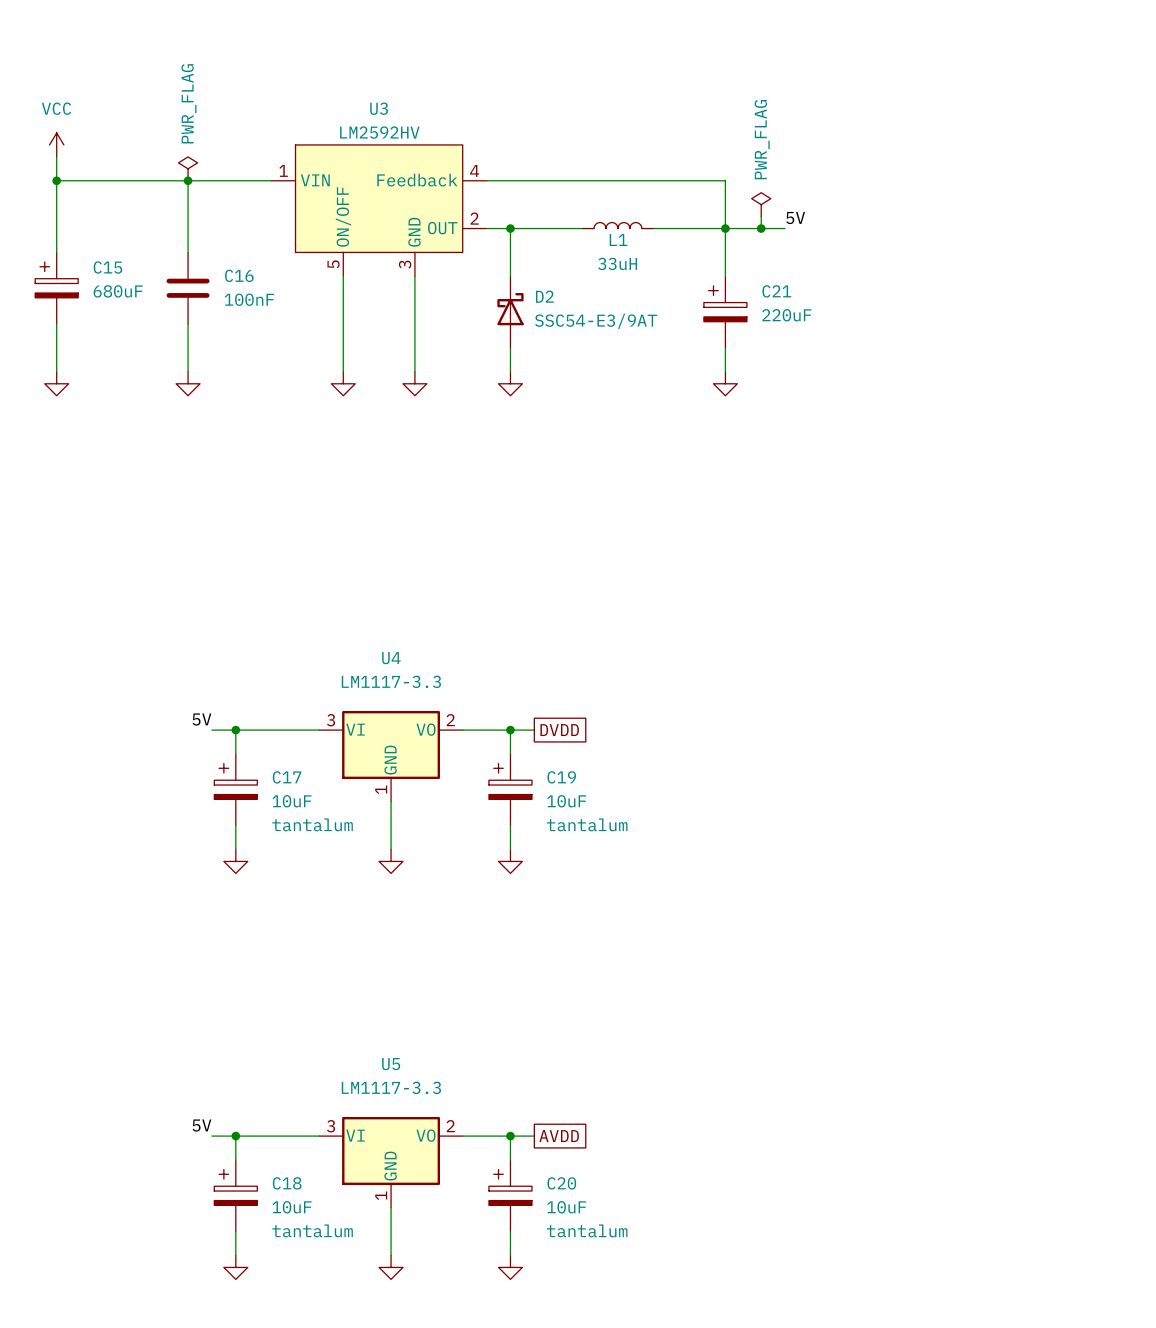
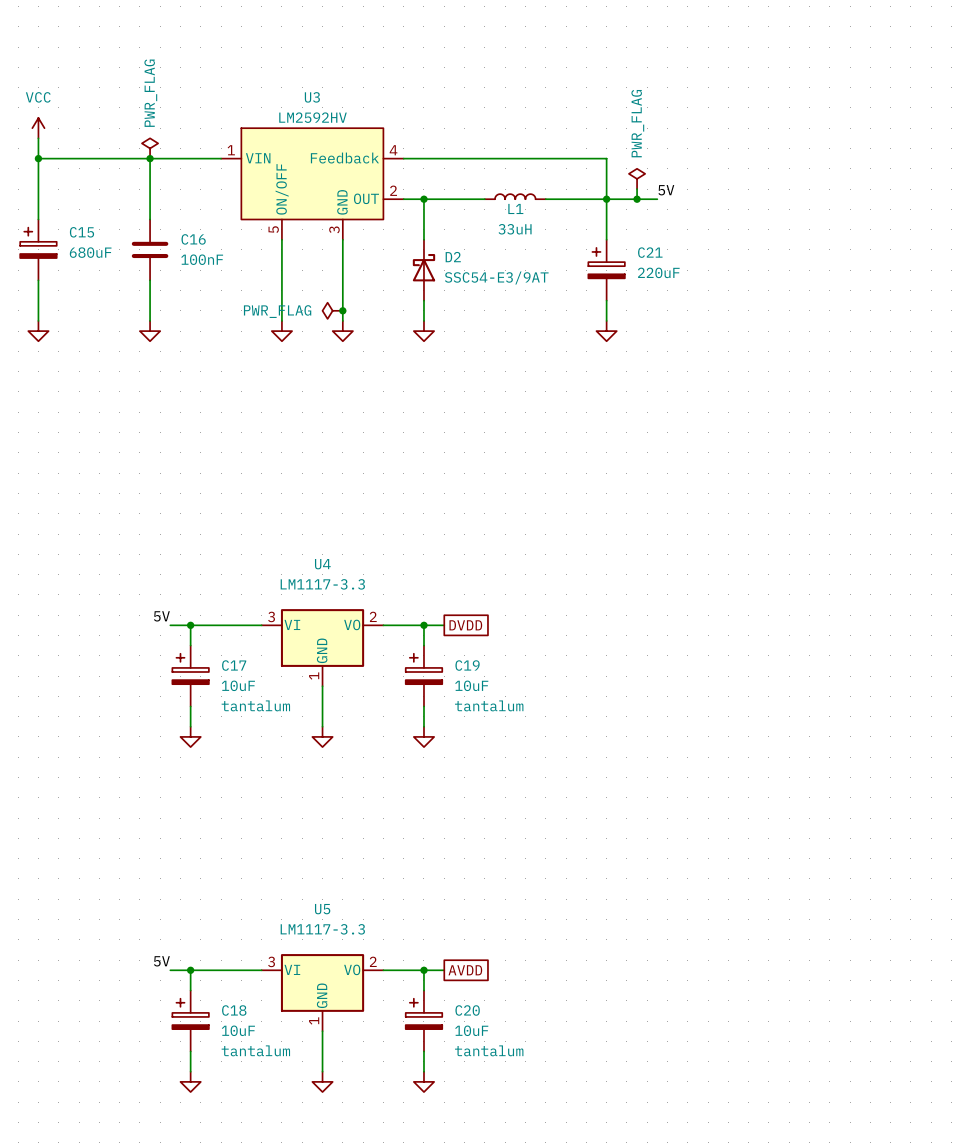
power symbol: none -> PWR_FLAG (332, 310)
junction: none -> (342, 310)

